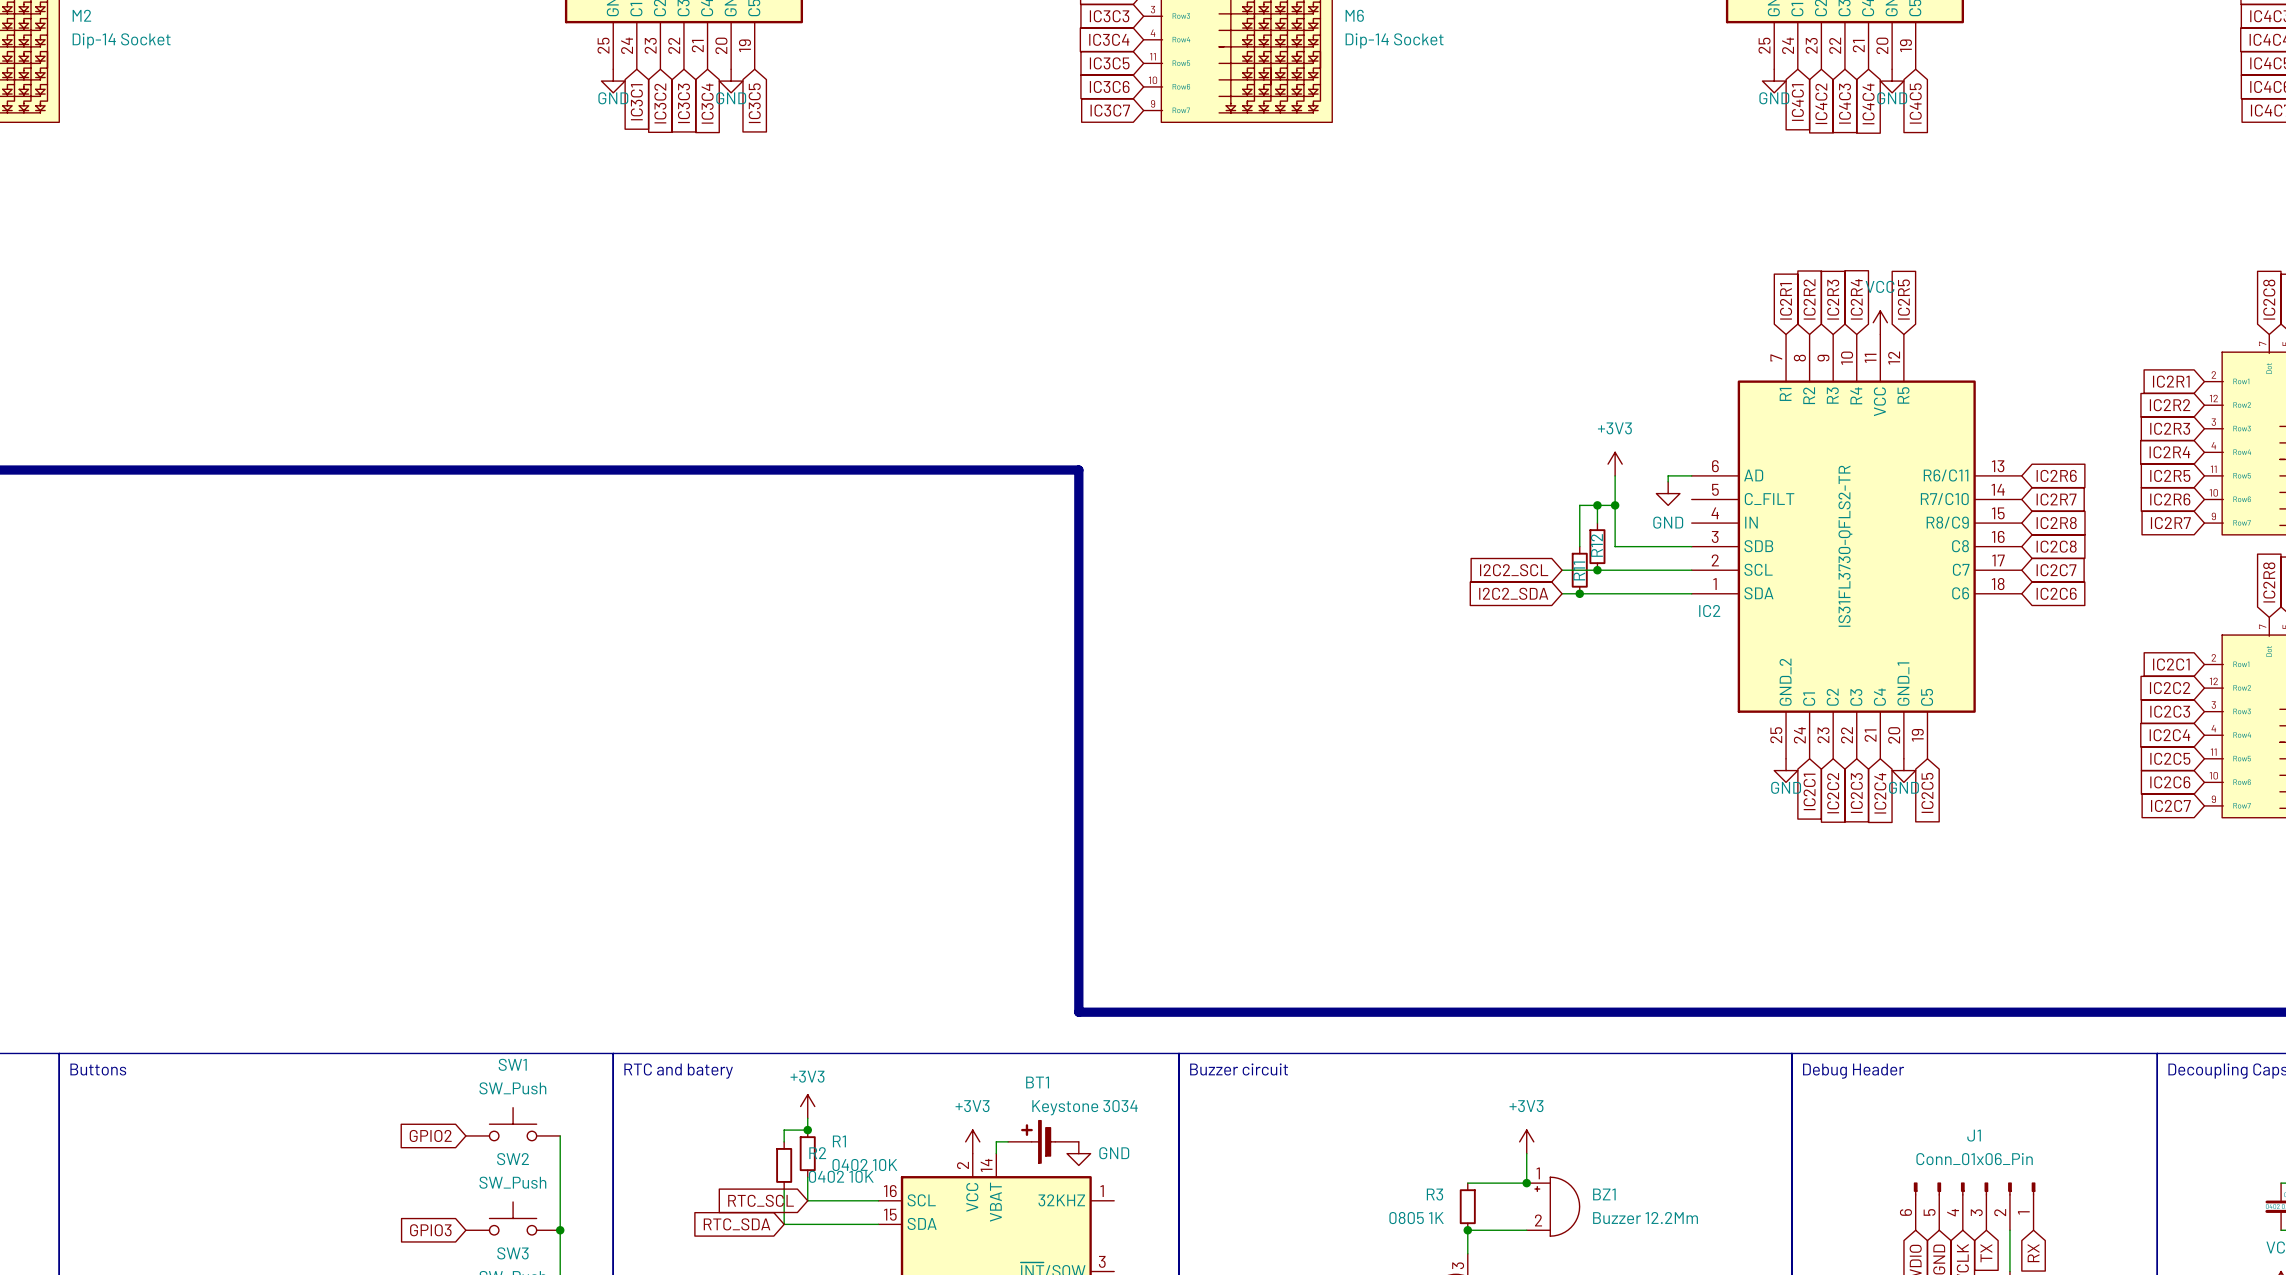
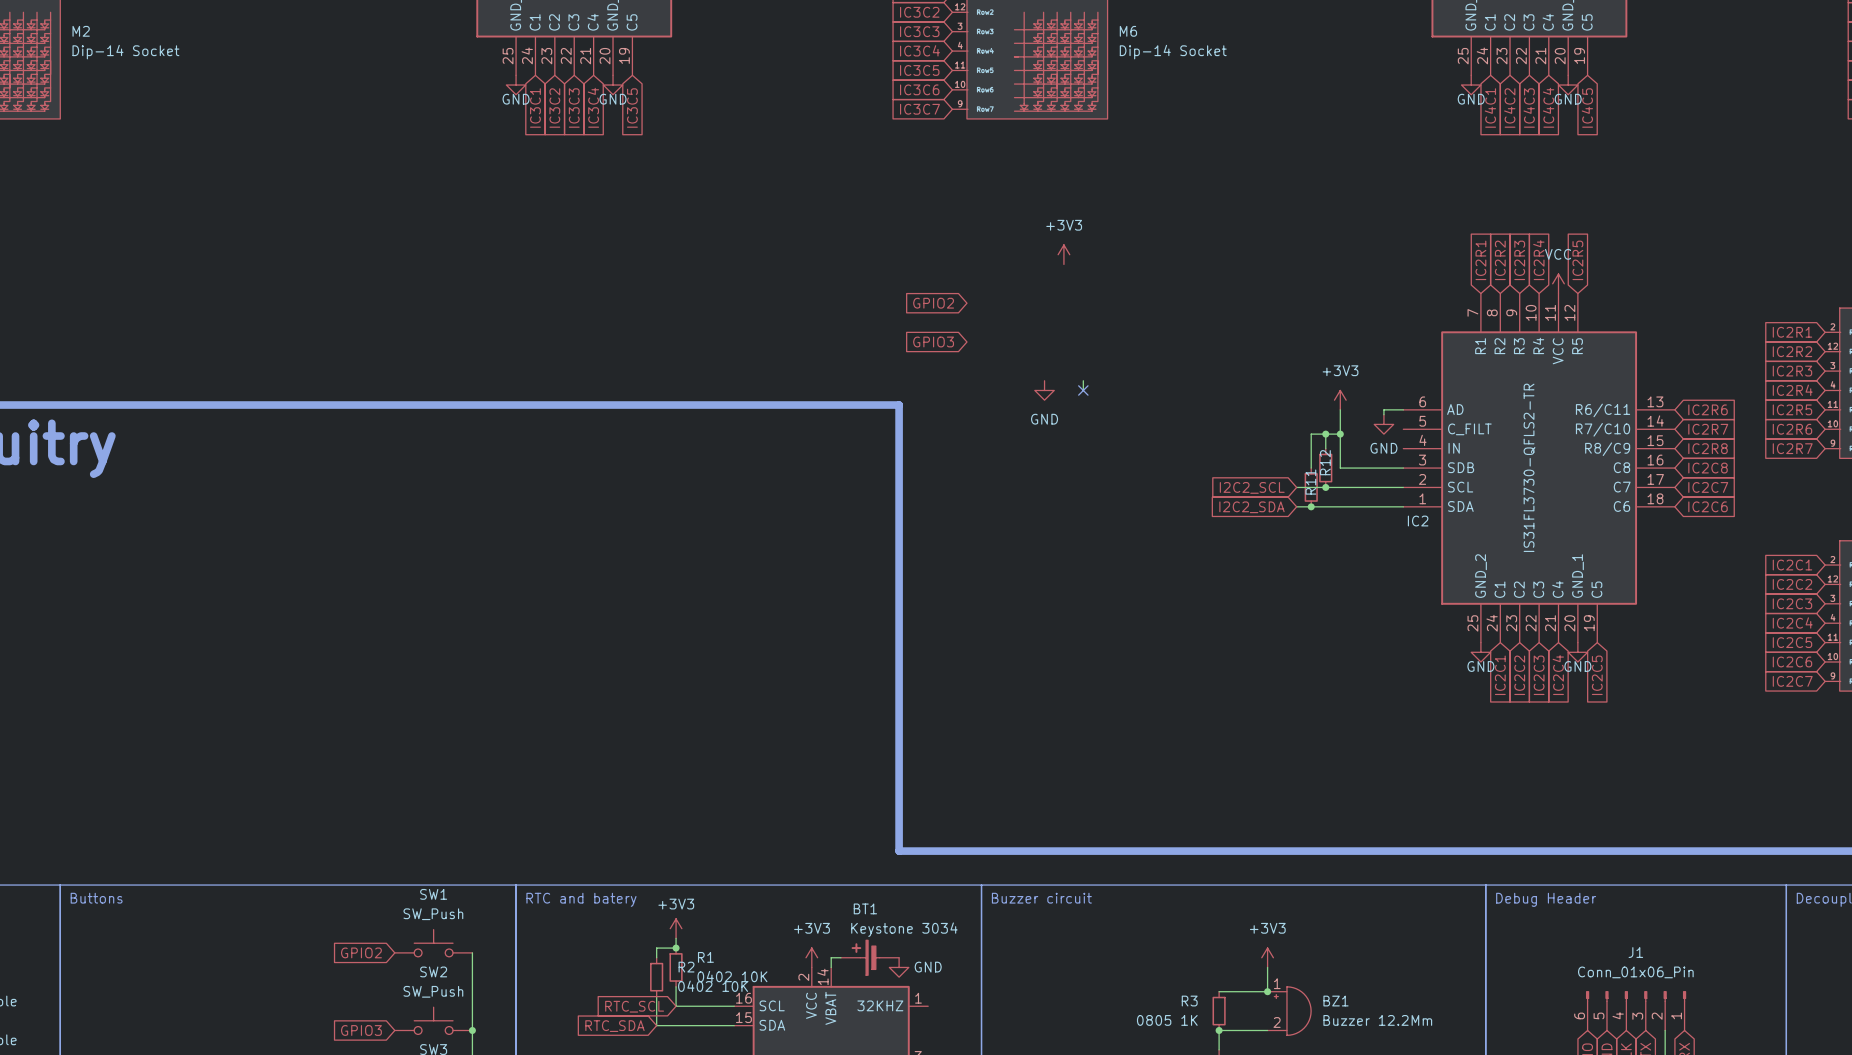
power symbol: none -> +3V3 (1063, 254)
global label: none -> GPIO2 (933, 303)
global label: none -> GPIO3 (933, 341)
wire: none -> (1083, 380) (1083, 390)
power symbol: none -> GND (1044, 390)
no-connect mark: none -> (1083, 390)

